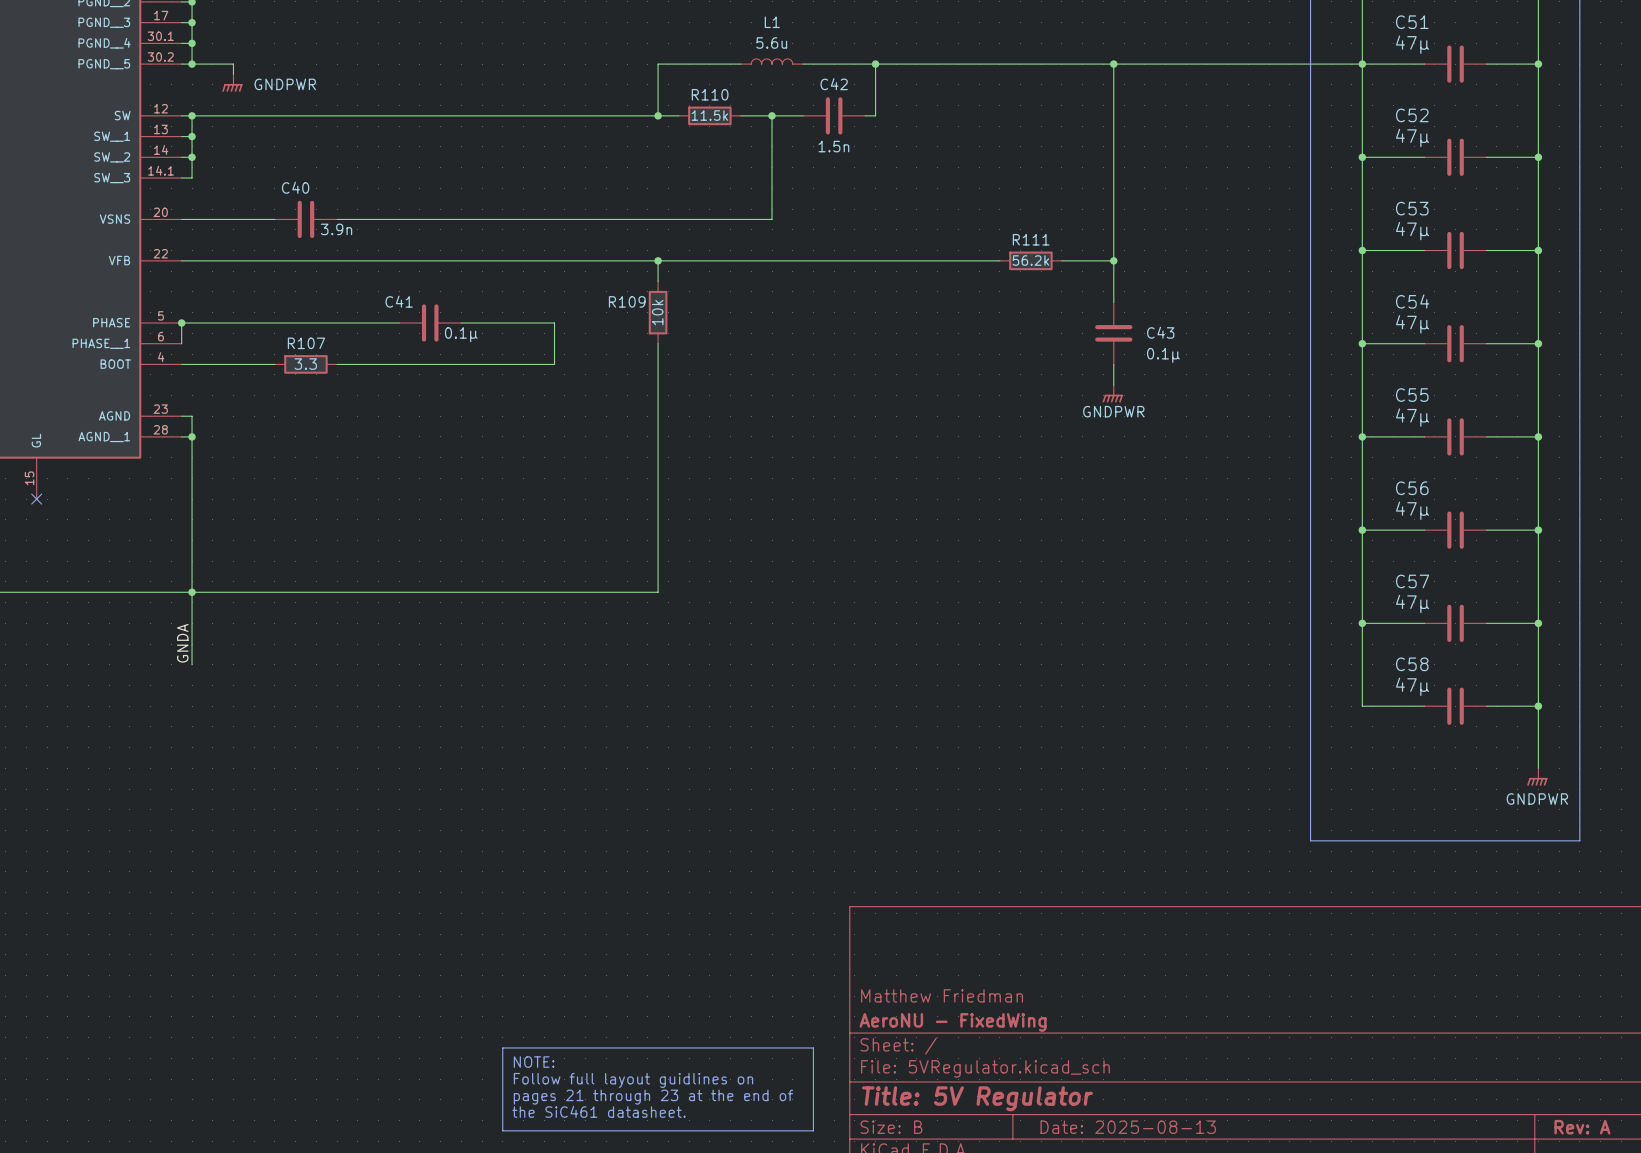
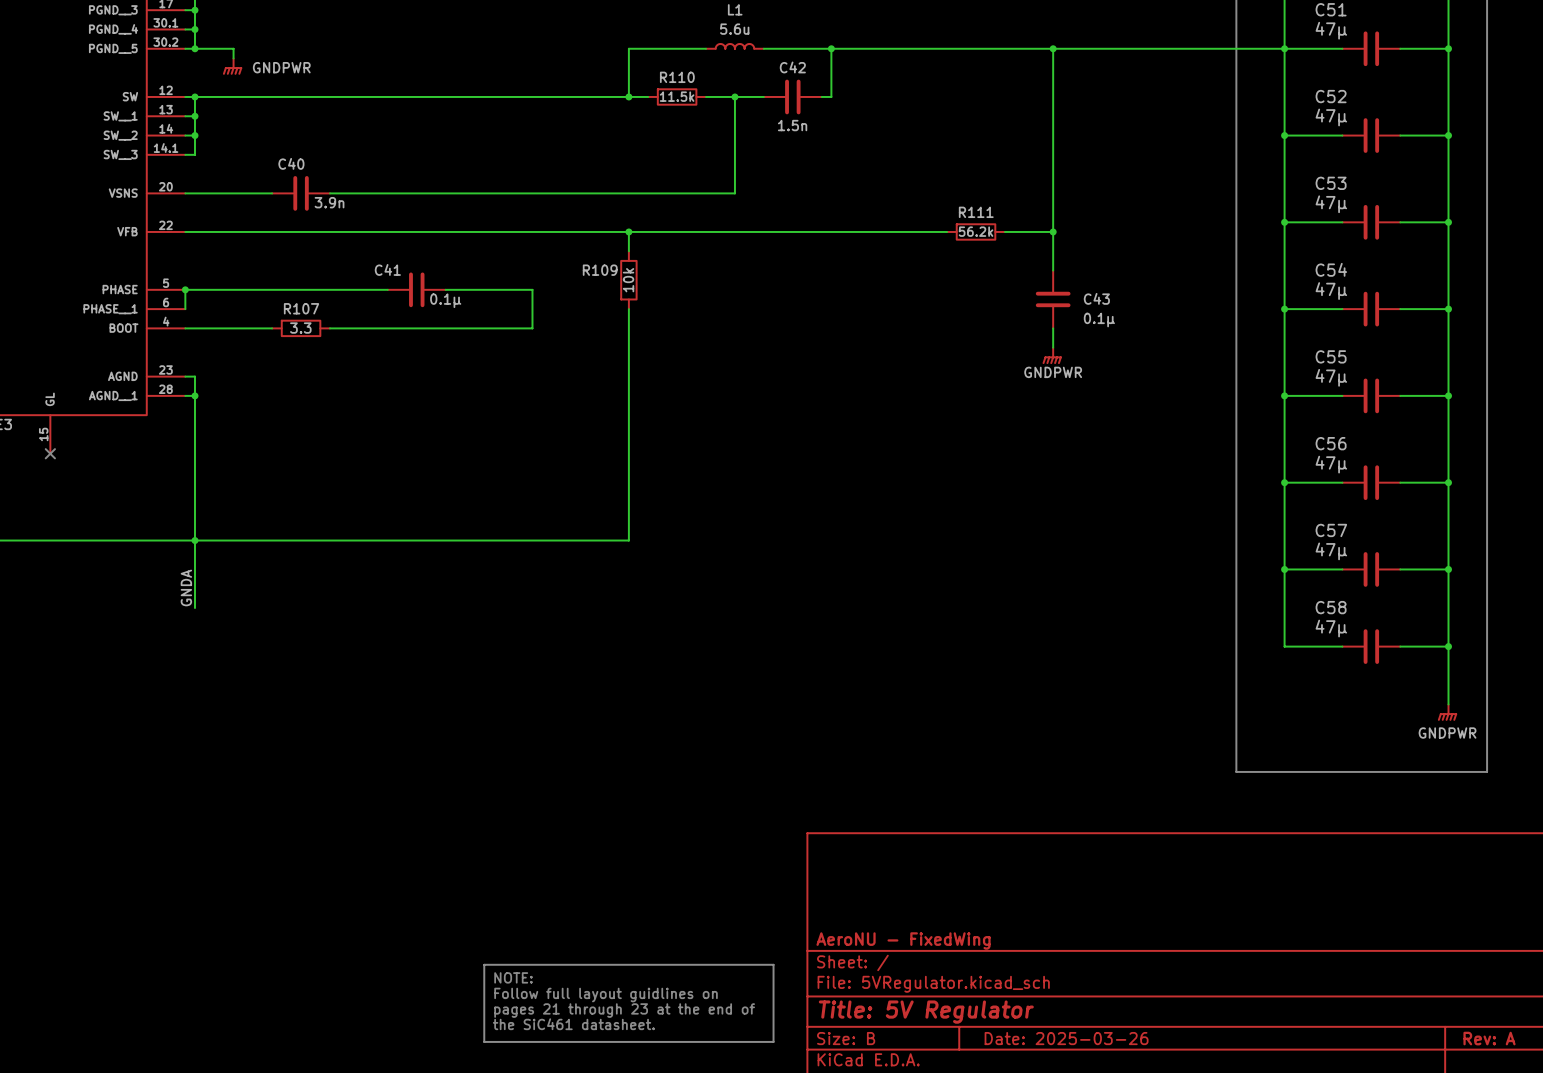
title block: Matthew Friedman (942, 995) -> none
title block: Date: 2025-08-13 (1128, 1127) -> Date: 2025-03-26 (1066, 1038)

